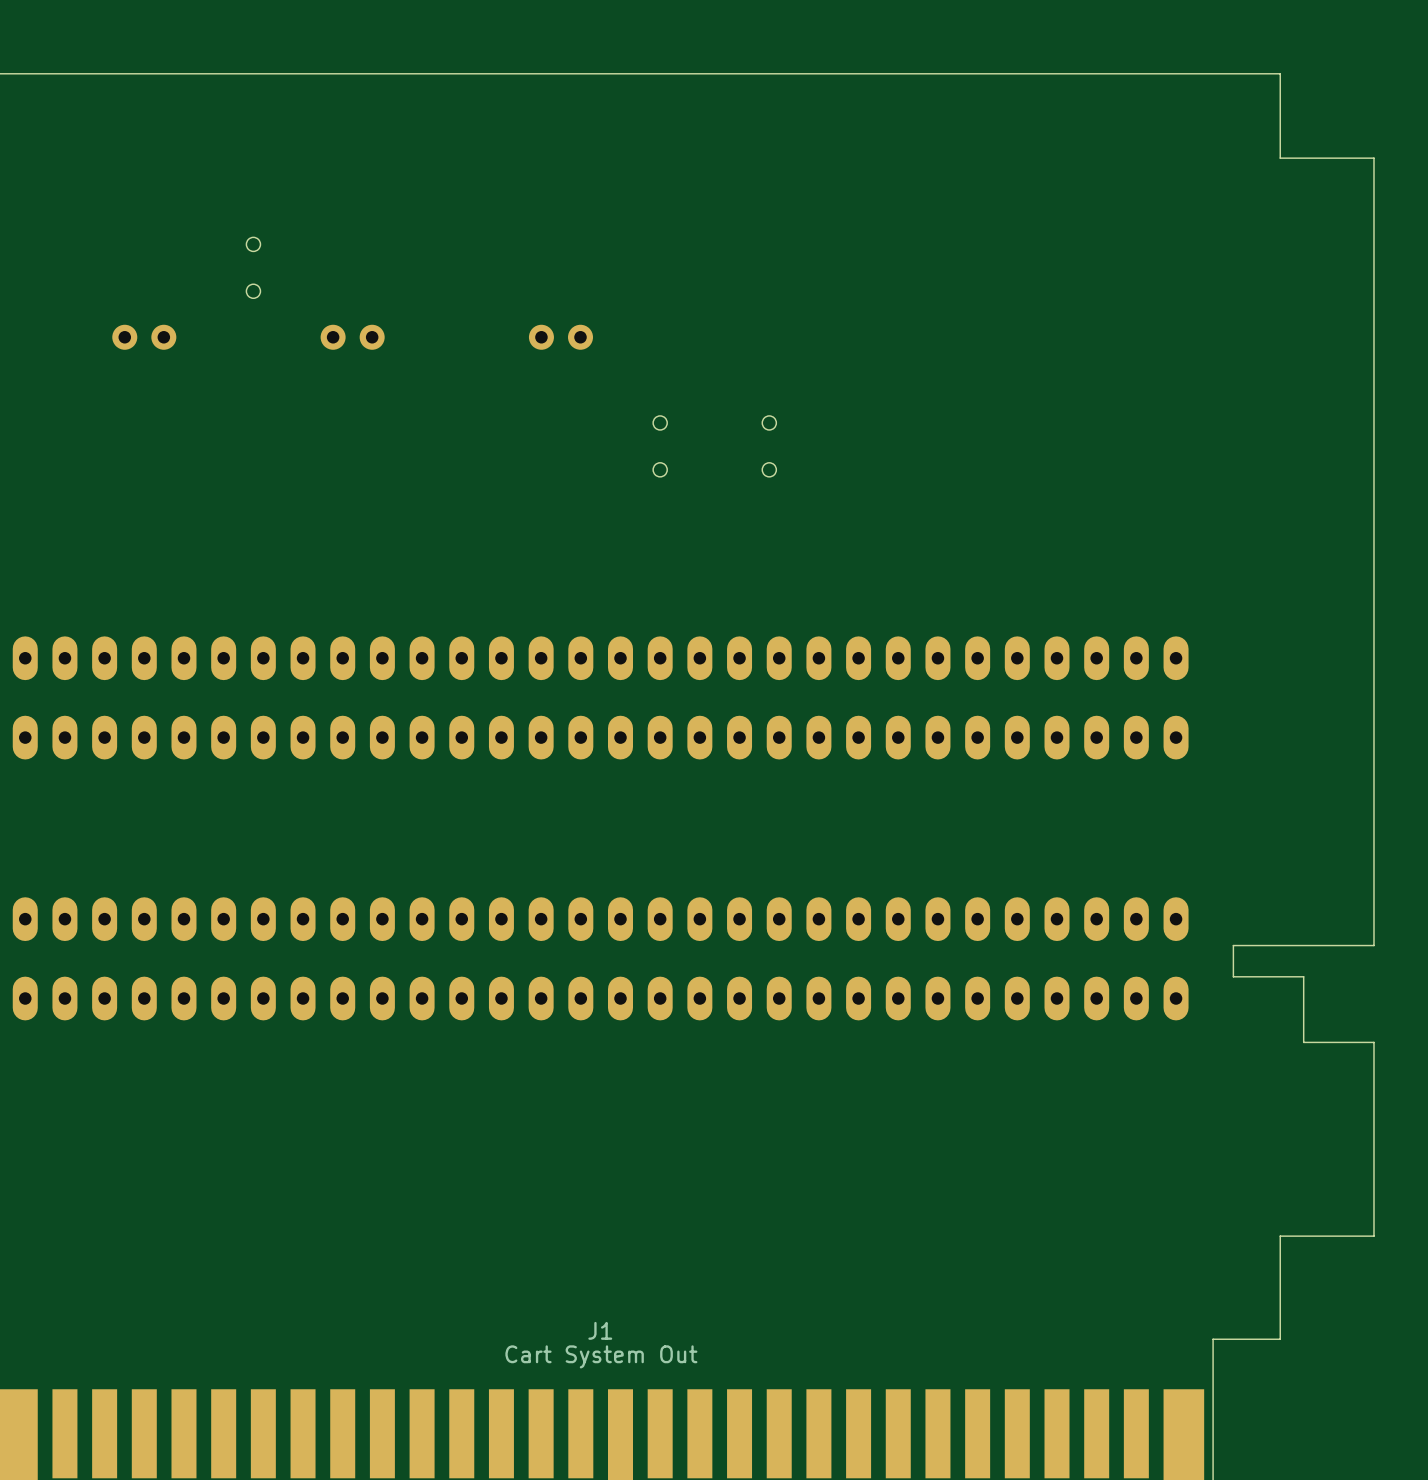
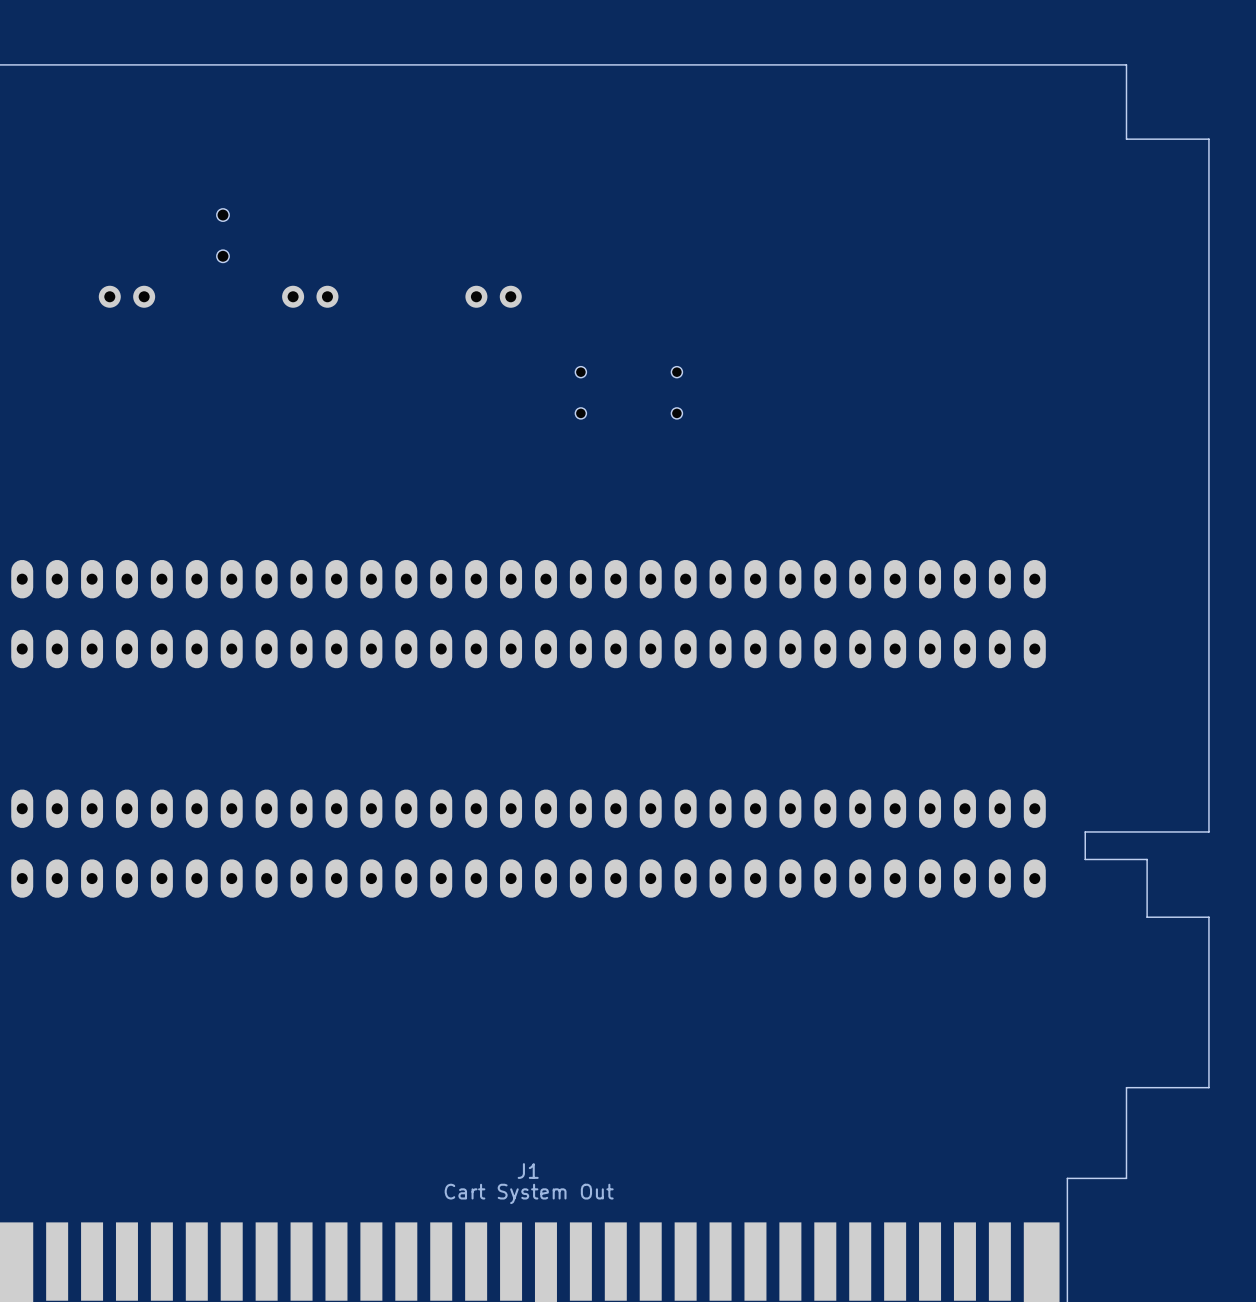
part footprint: [246, 236, 261, 299] -> [216, 208, 230, 263]
part footprint: [652, 415, 668, 478] -> [575, 366, 587, 419]
part footprint: [761, 415, 777, 478] -> [671, 366, 683, 419]

